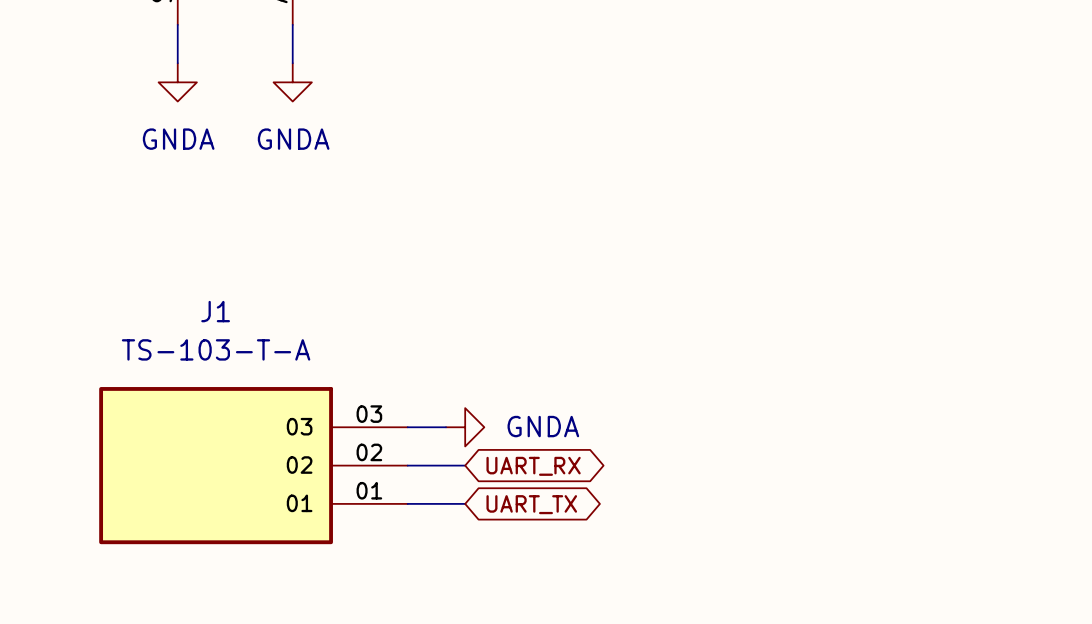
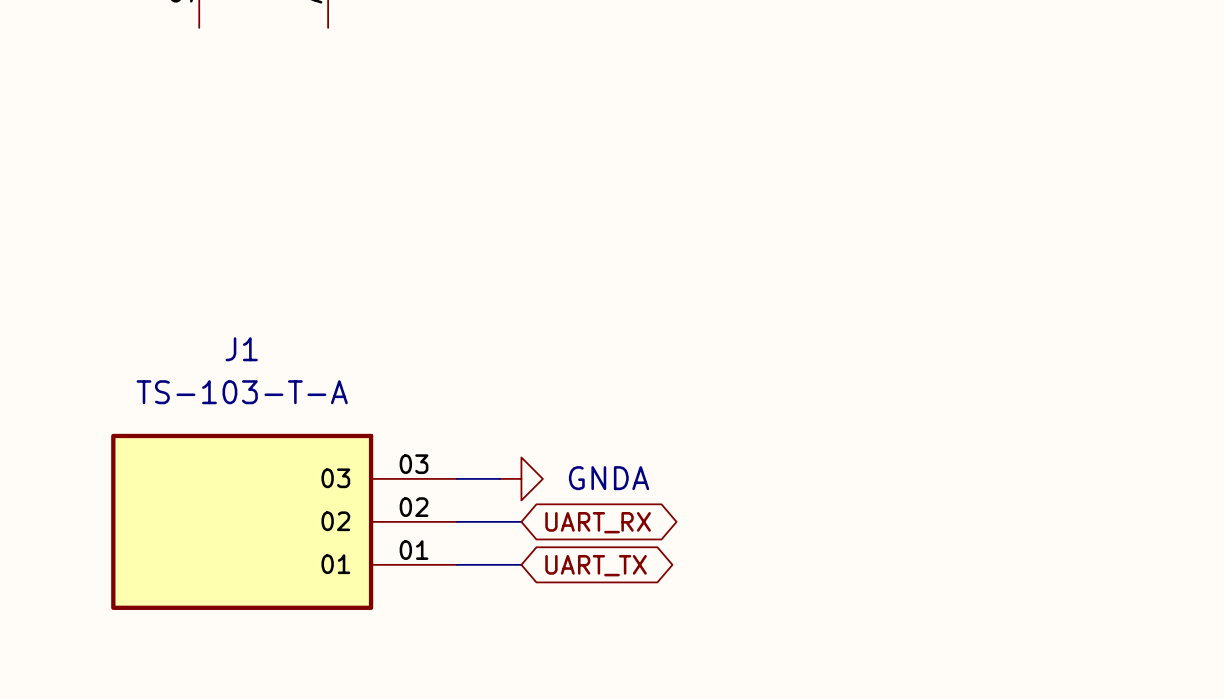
wire: (177, 24) (177, 63) -> none
wire: (292, 24) (292, 63) -> none
power symbol: GNDA (177, 82) -> none
power symbol: GNDA (292, 82) -> none

